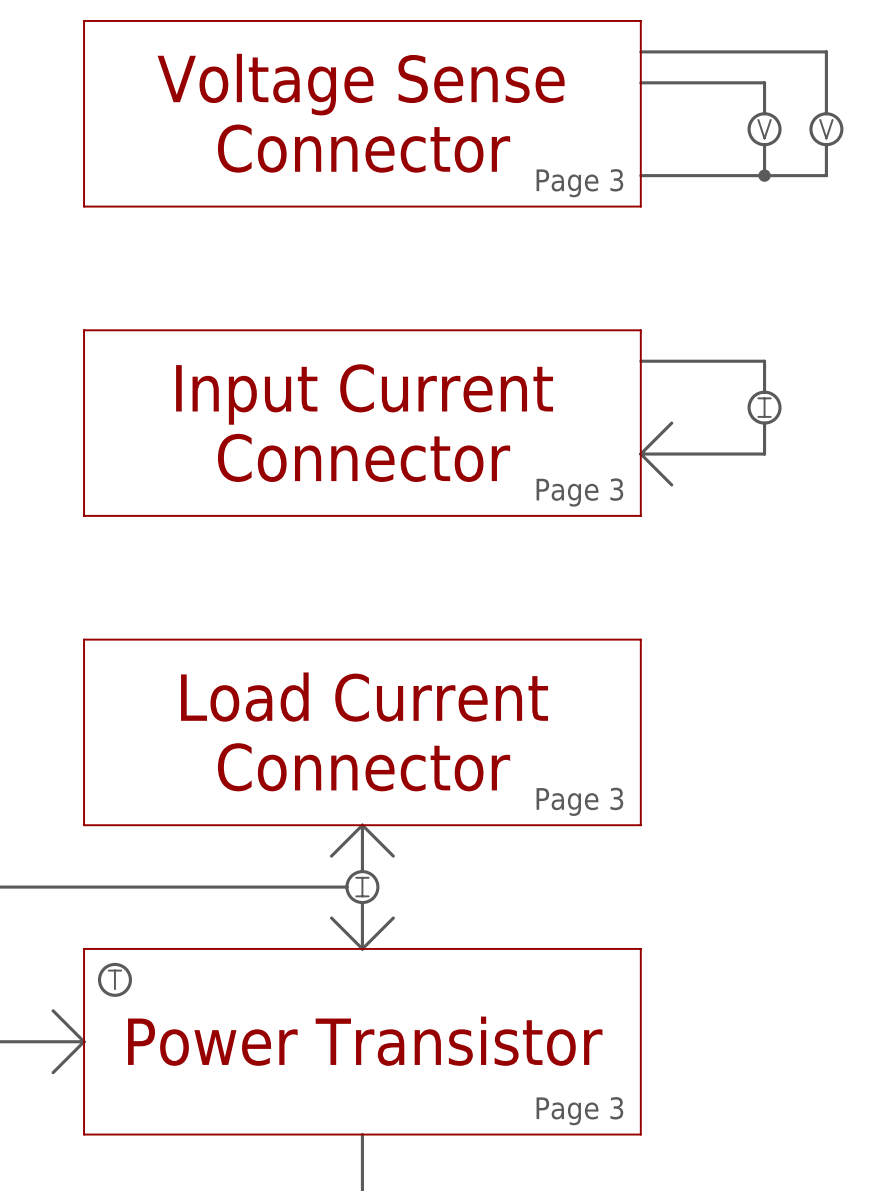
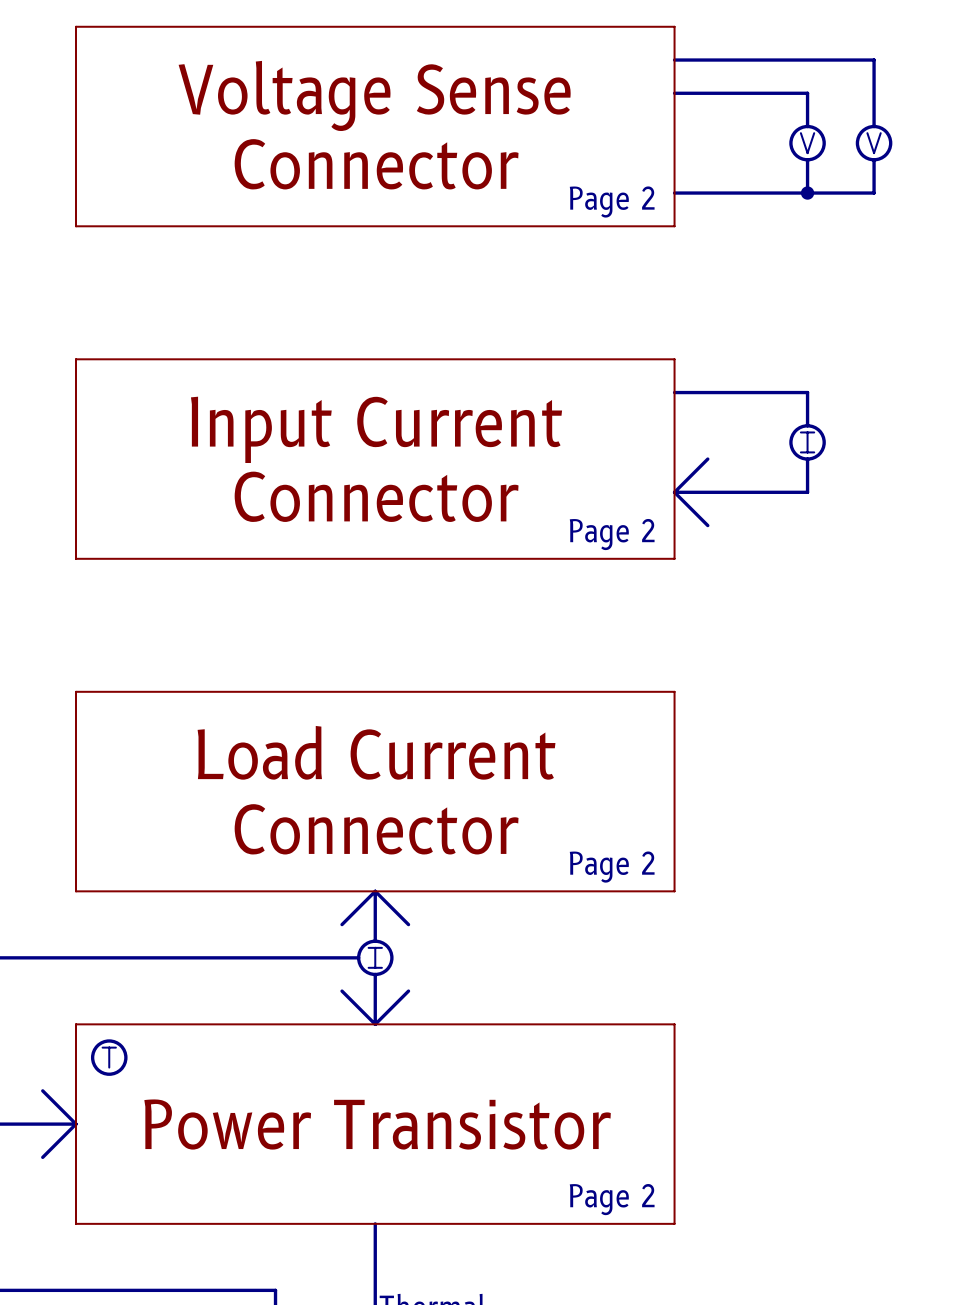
text: Page 3 (579, 183) -> Page 2 (612, 202)
text: Page 3 (579, 492) -> Page 2 (612, 534)
text: Page 3 (579, 801) -> Page 2 (612, 867)
text: Page 3 (579, 1111) -> Page 2 (612, 1199)

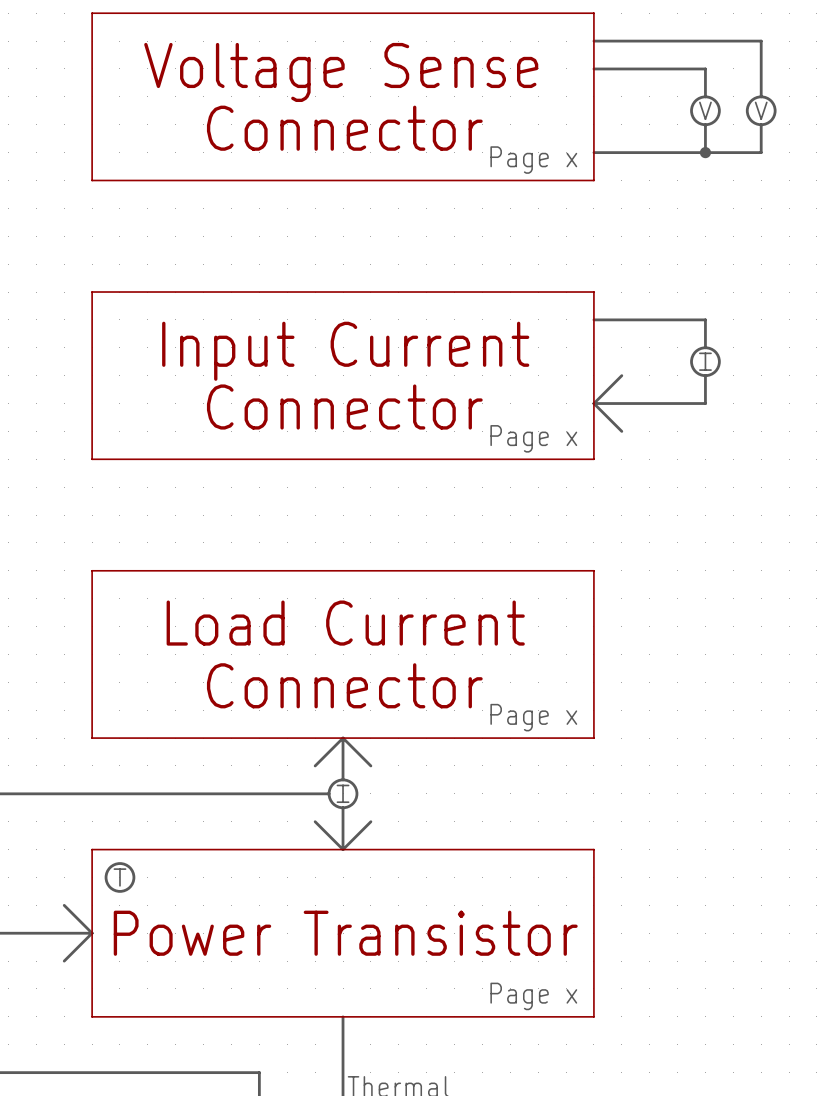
text: Page 2 (612, 202) -> Page x (533, 160)
text: Page 2 (612, 534) -> Page x (533, 438)
text: Page 2 (612, 867) -> Page x (533, 717)
text: Page 2 (612, 1199) -> Page x (533, 996)

